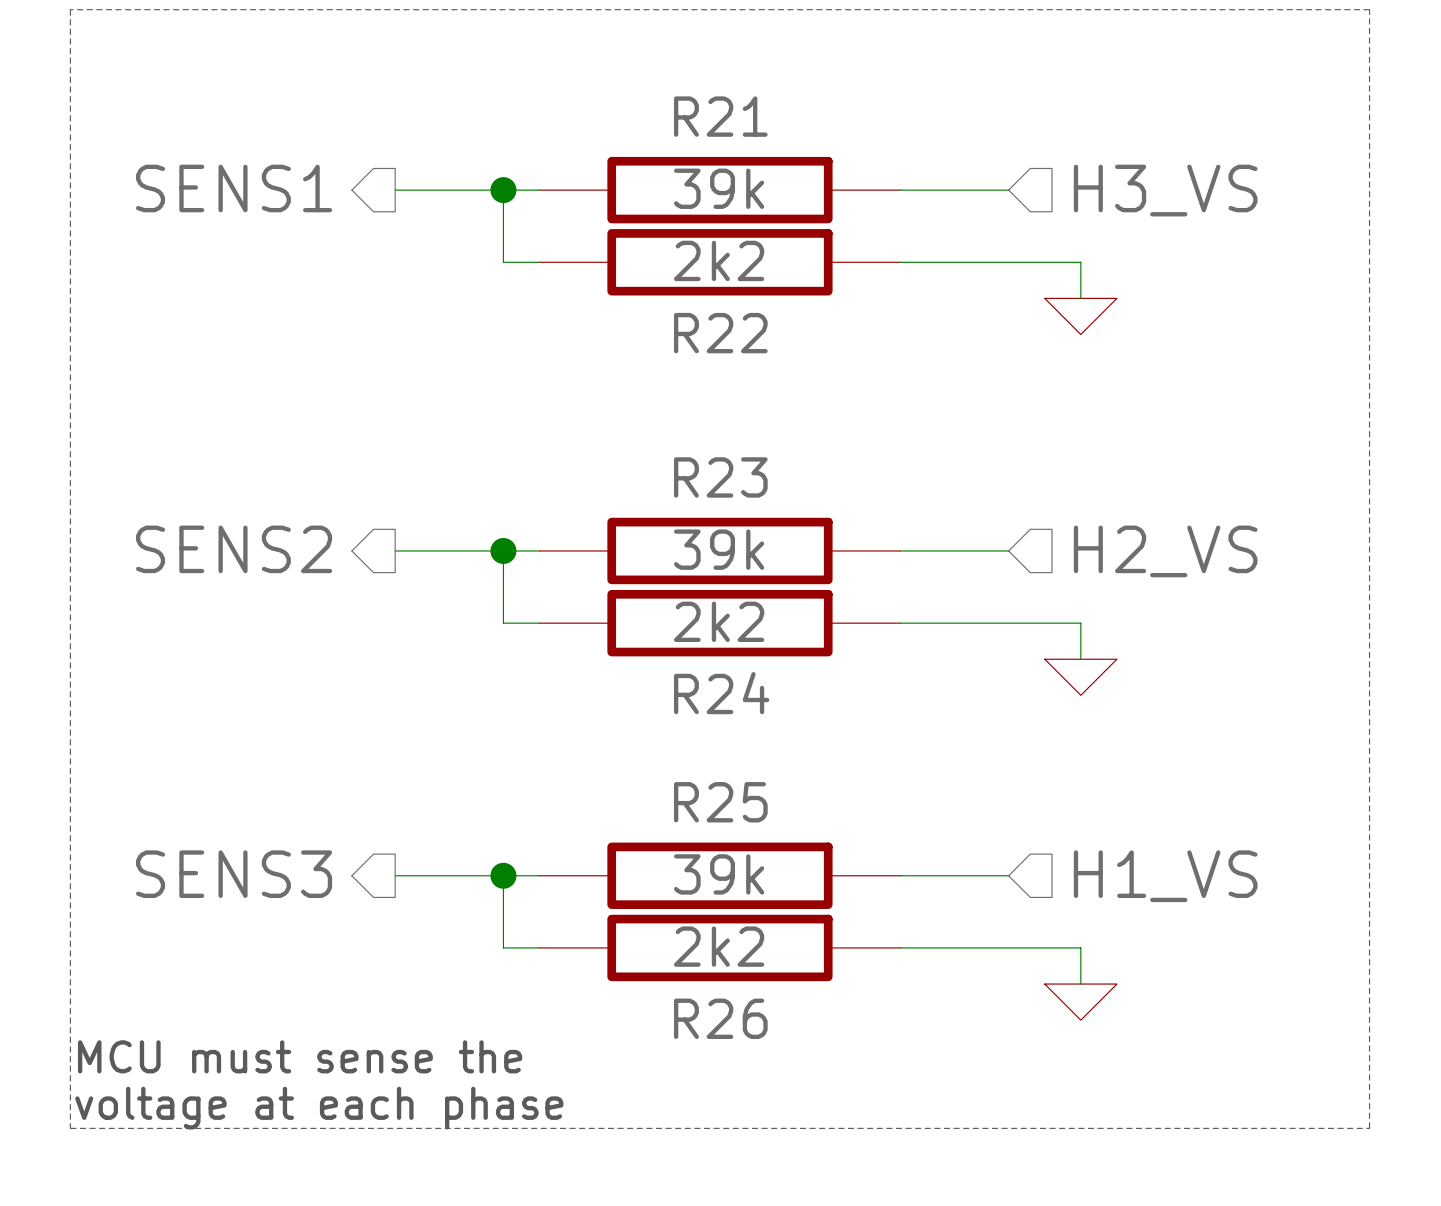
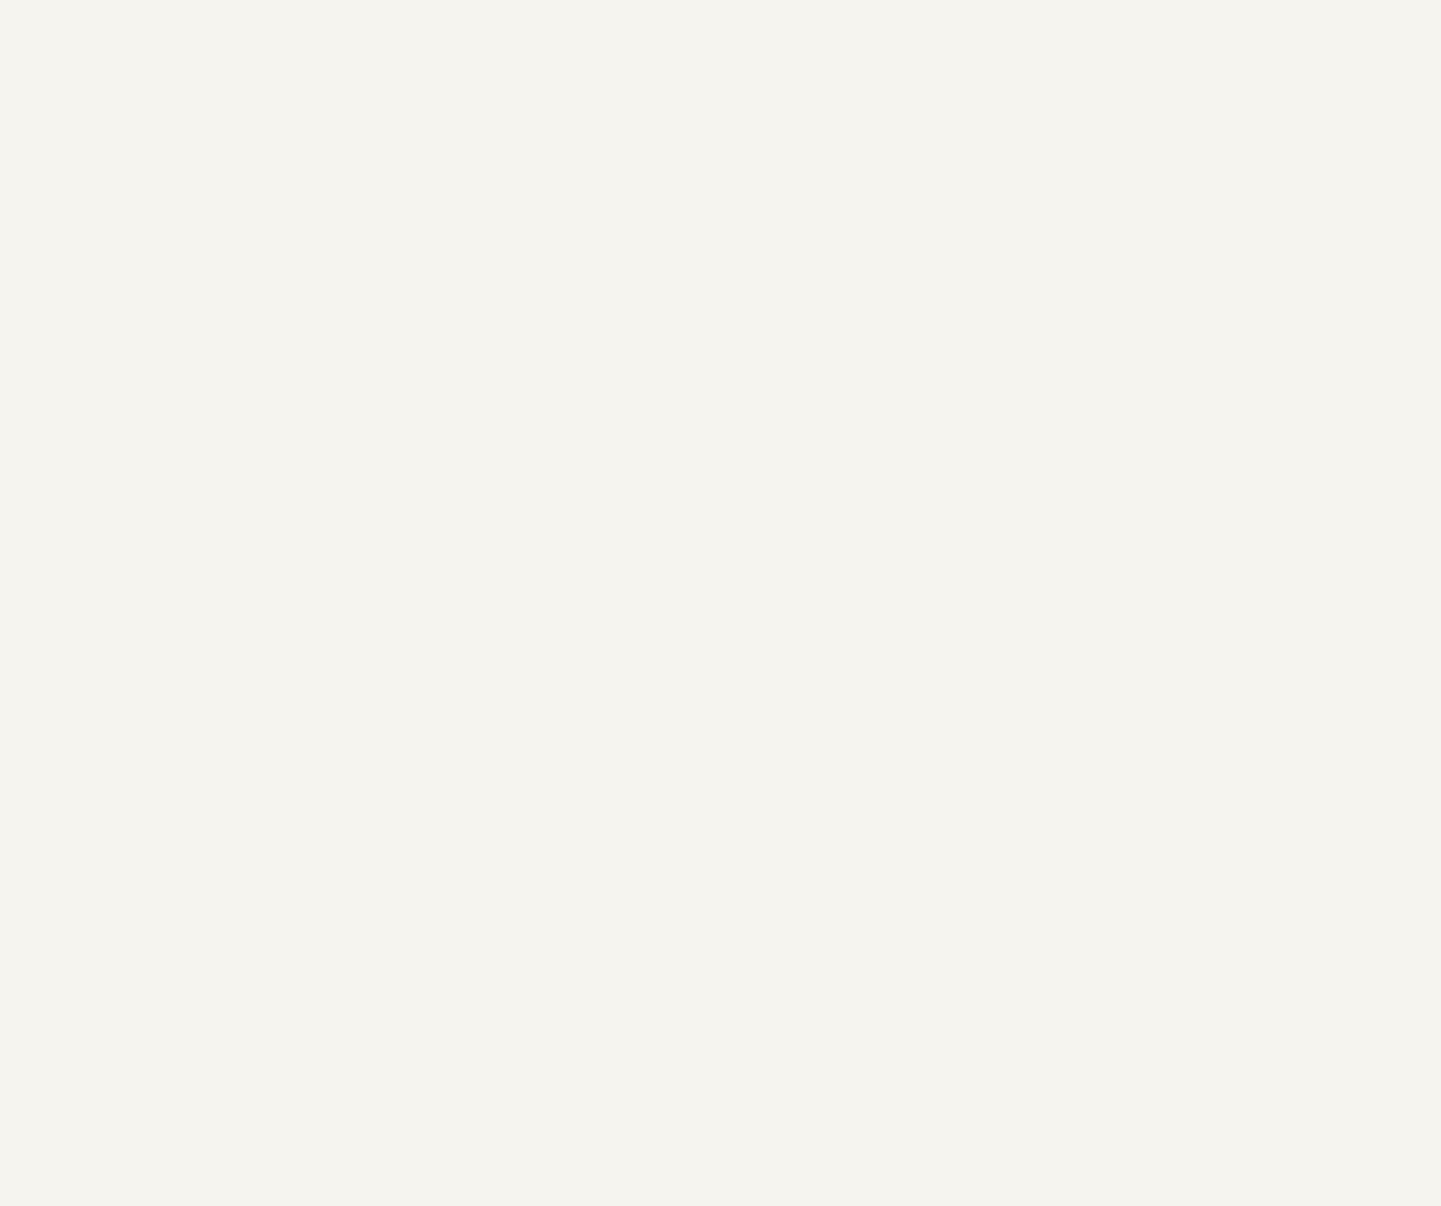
line: (70, 9) (1369, 9) (1369, 1128) (70, 1128) (70, 9) -> none
hierarchical label: SENS1 (234, 188) -> none
wire: (395, 190) (539, 190) -> none
wire: (503, 190) (503, 262) (539, 262) -> none
junction: (503, 190) -> none
R21: 39k (719, 190) -> none
wire: (900, 190) (1008, 190) -> none
hierarchical label: H3_VS (1165, 190) -> none
R22: 2k2 (719, 262) -> none
wire: (900, 262) (1080, 262) (1080, 298) -> none
power symbol: (1080, 316) -> none
hierarchical label: SENS2 (234, 549) -> none
wire: (395, 550) (539, 550) -> none
wire: (503, 550) (503, 623) (539, 623) -> none
junction: (503, 550) -> none
R23: 39k (719, 550) -> none
wire: (900, 550) (1008, 550) -> none
hierarchical label: H2_VS (1165, 551) -> none
R24: 2k2 (719, 623) -> none
wire: (900, 623) (1080, 623) (1080, 659) -> none
power symbol: (1080, 677) -> none
hierarchical label: SENS3 (234, 874) -> none
wire: (395, 875) (539, 875) -> none
wire: (503, 875) (503, 947) (539, 947) -> none
junction: (503, 875) -> none
R25: 39k (719, 875) -> none
wire: (900, 875) (1008, 875) -> none
hierarchical label: H1_VS (1165, 876) -> none
R26: 2k2 (719, 947) -> none
wire: (900, 947) (1080, 947) (1080, 984) -> none
power symbol: (1080, 1002) -> none
text: MCU must sense the (300, 1056) -> none
text: voltage at each phase (319, 1108) -> none

